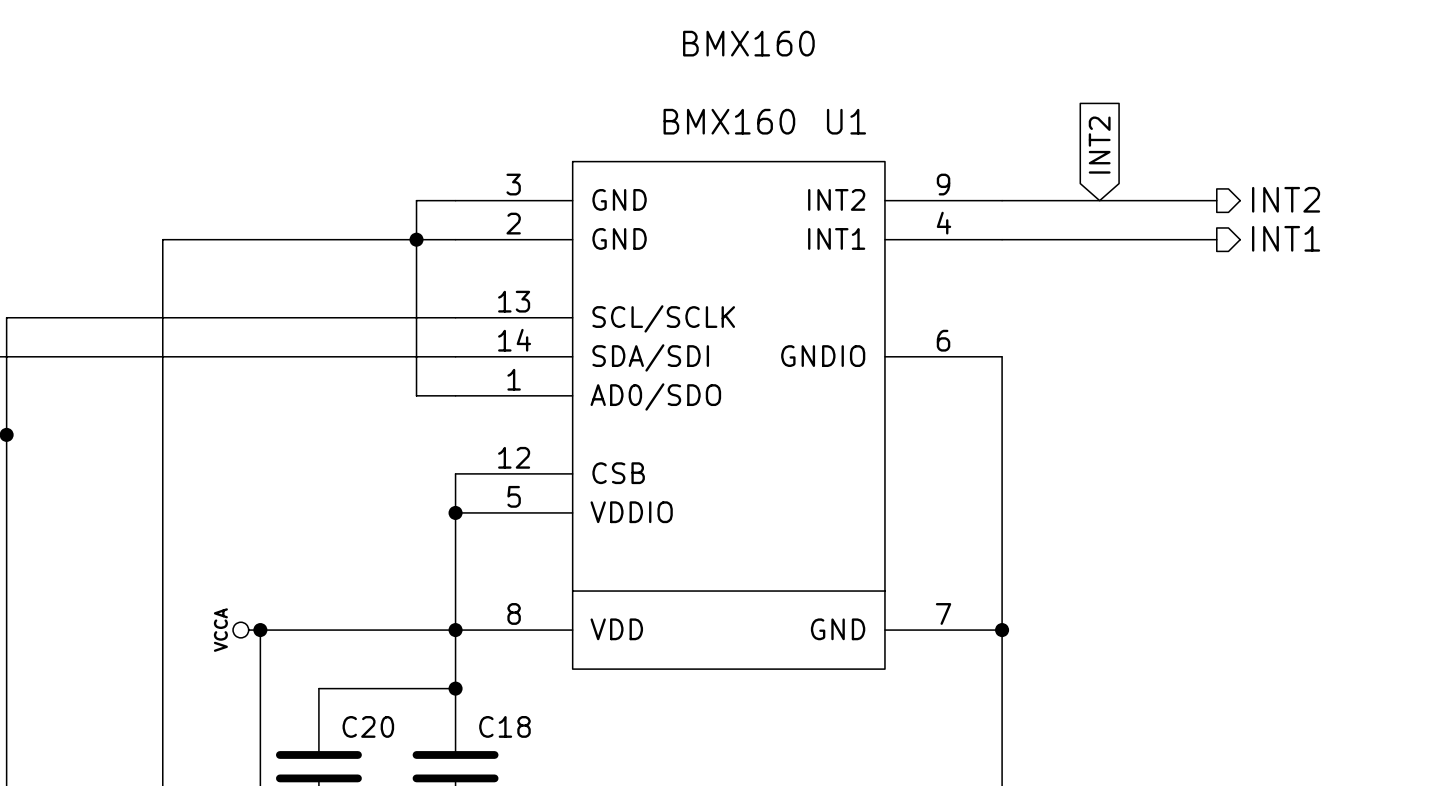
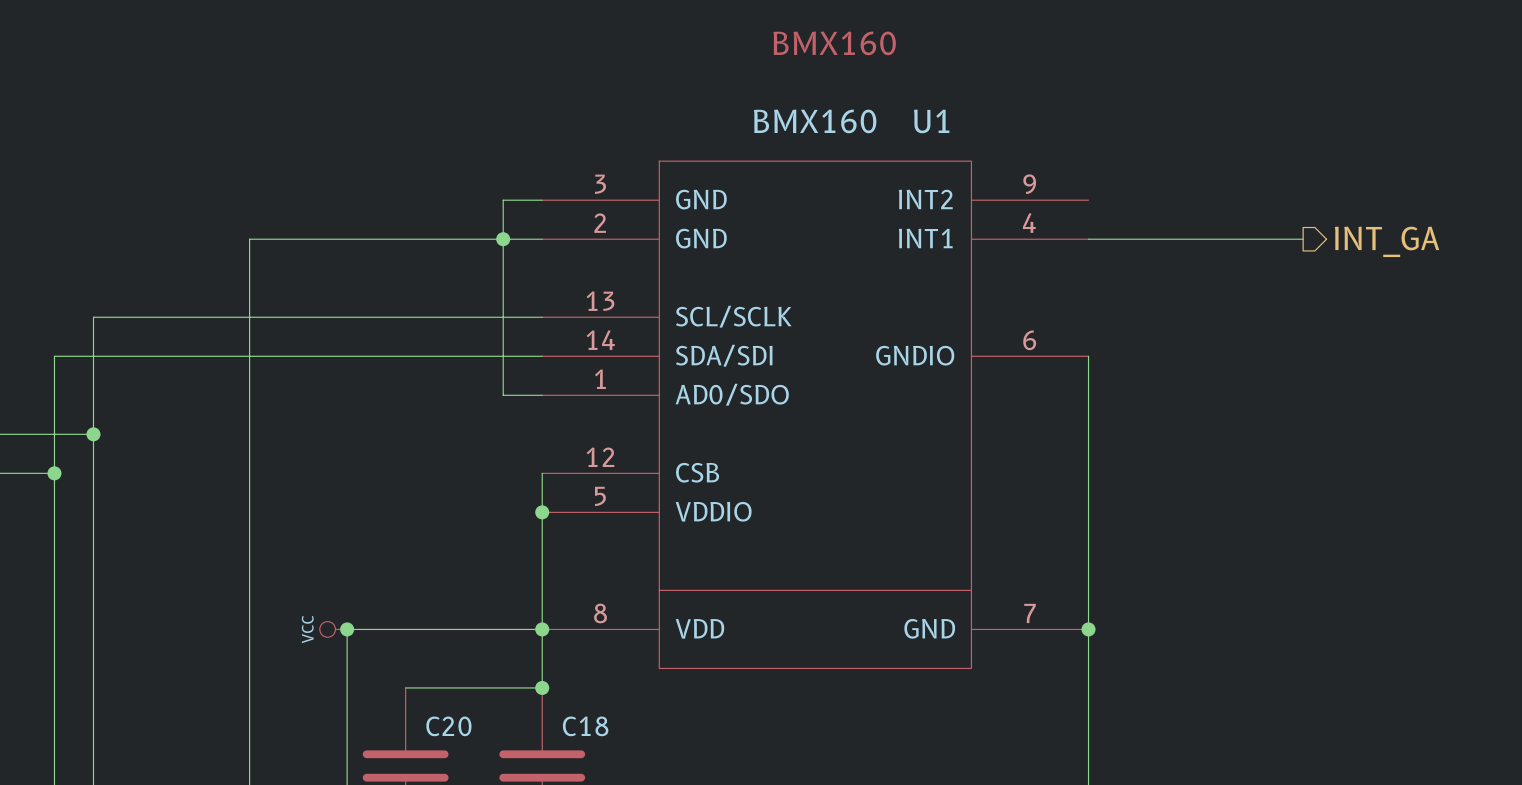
global label: INT2 (1099, 145) -> none
hierarchical label: INT2 (1286, 199) -> none
wire: (1002, 200) (1216, 200) -> none
hierarchical label: INT1 (1286, 238) -> INT_GA (1387, 241)
power symbol: VCCA (246, 630) -> VCC (333, 629)

